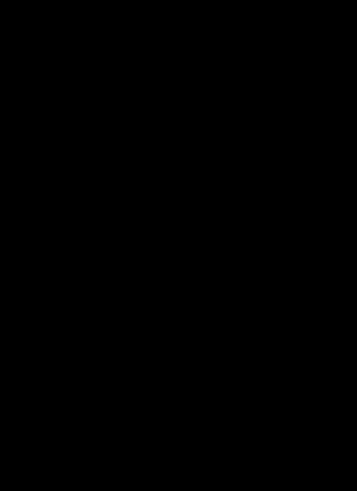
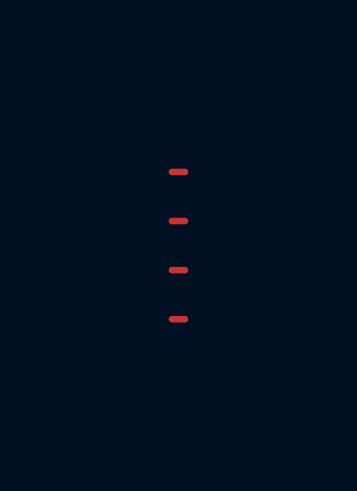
part: none -> (178, 171)
part: none -> (178, 221)
part: none -> (178, 270)
part: none -> (178, 319)

